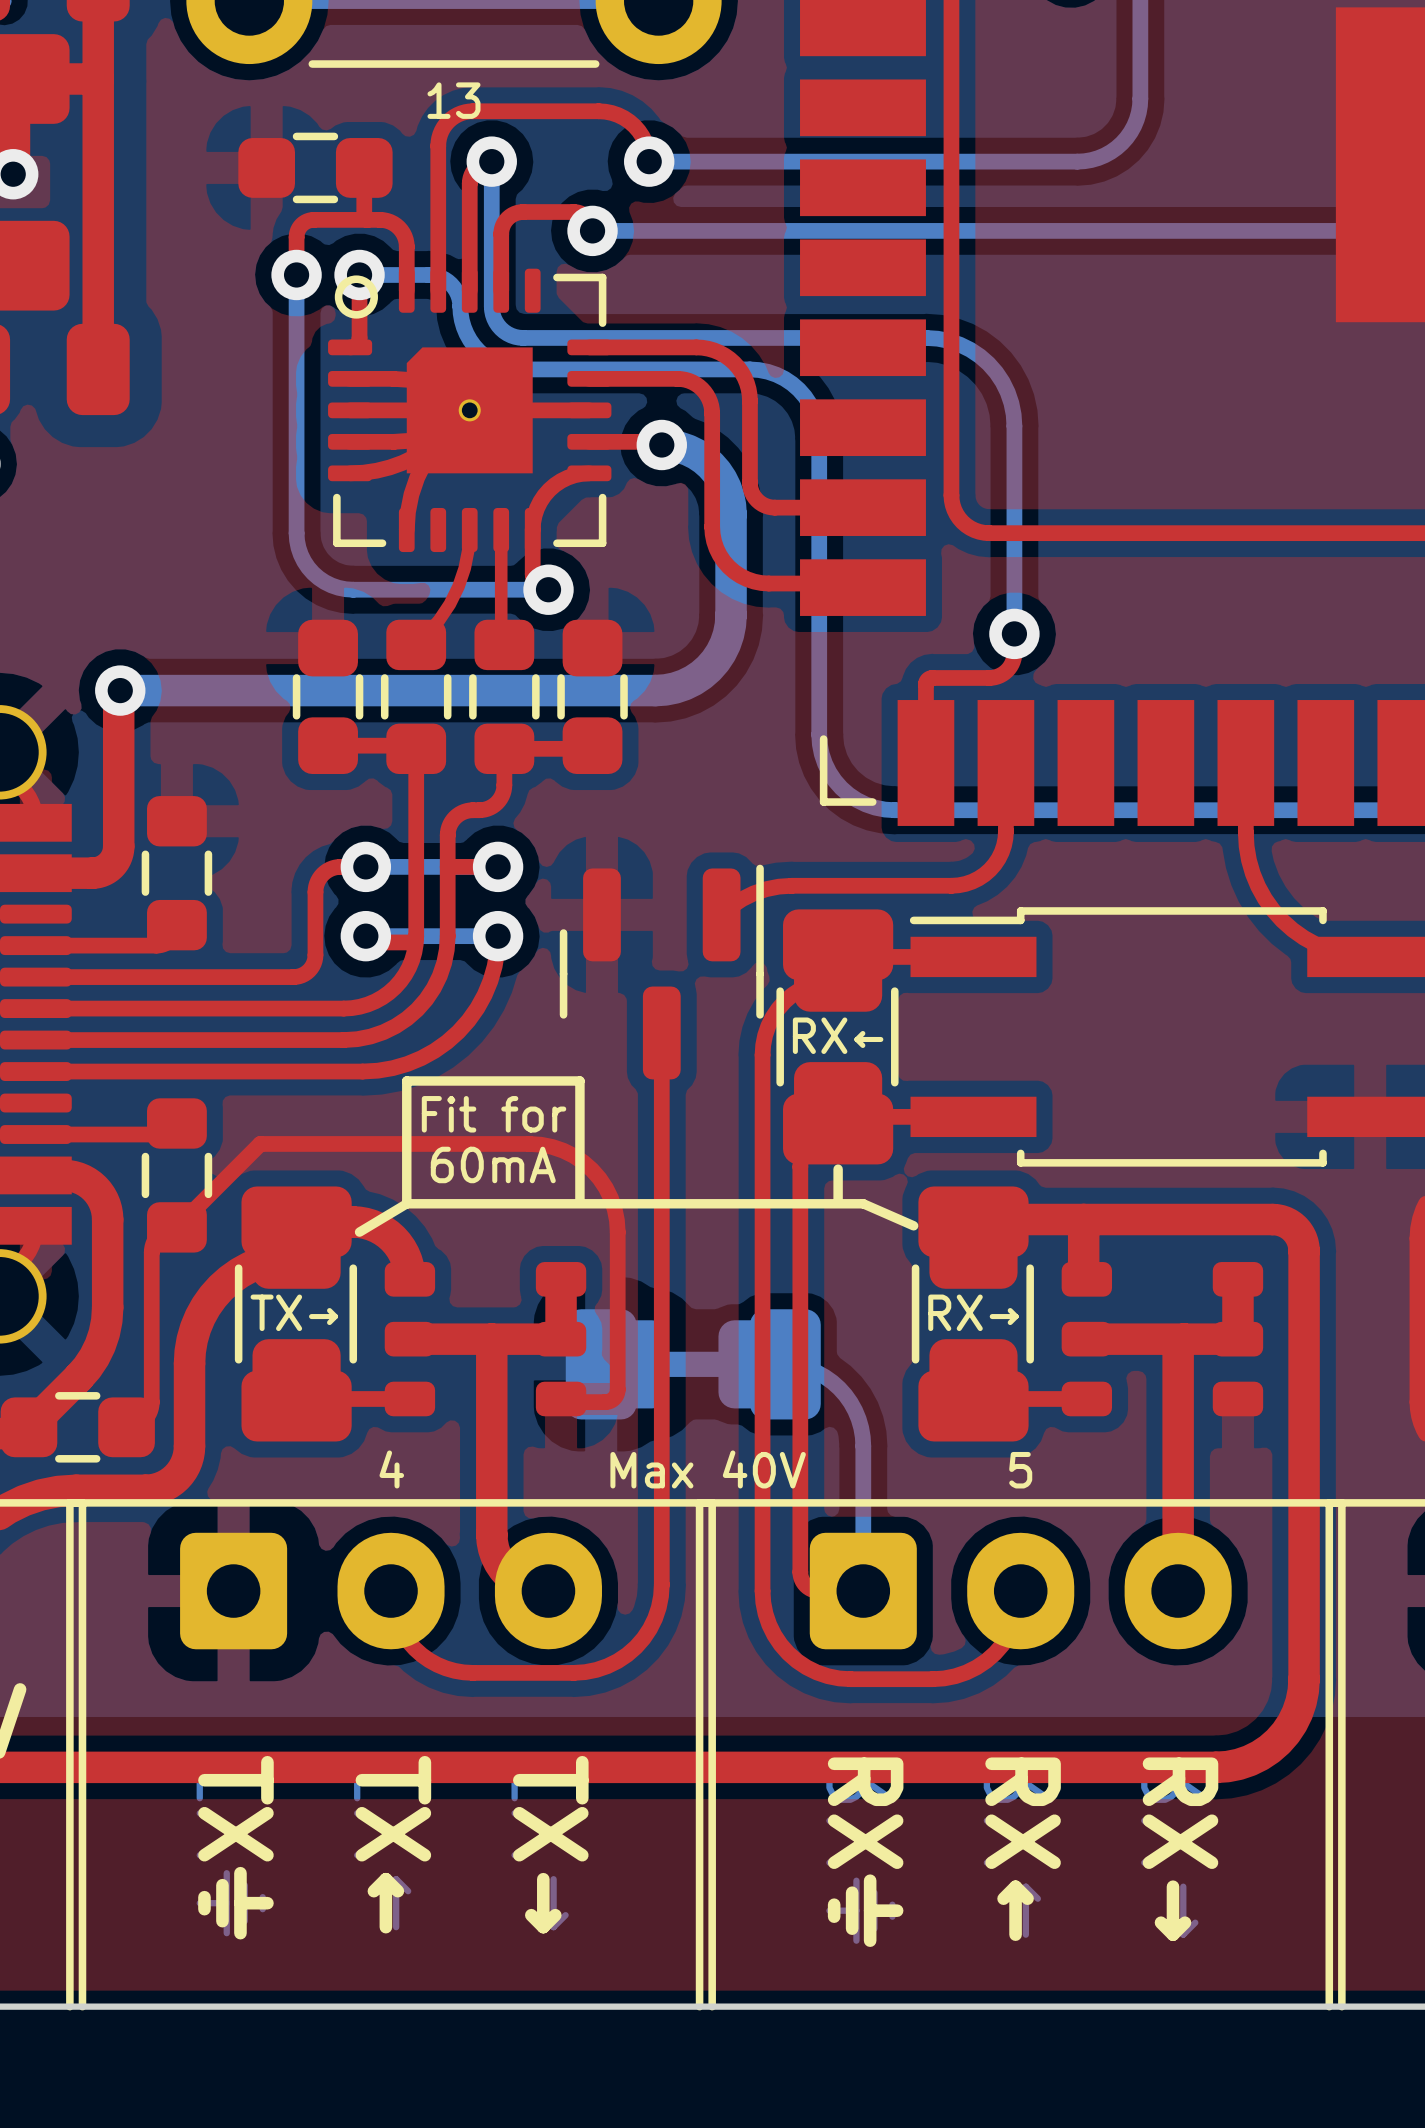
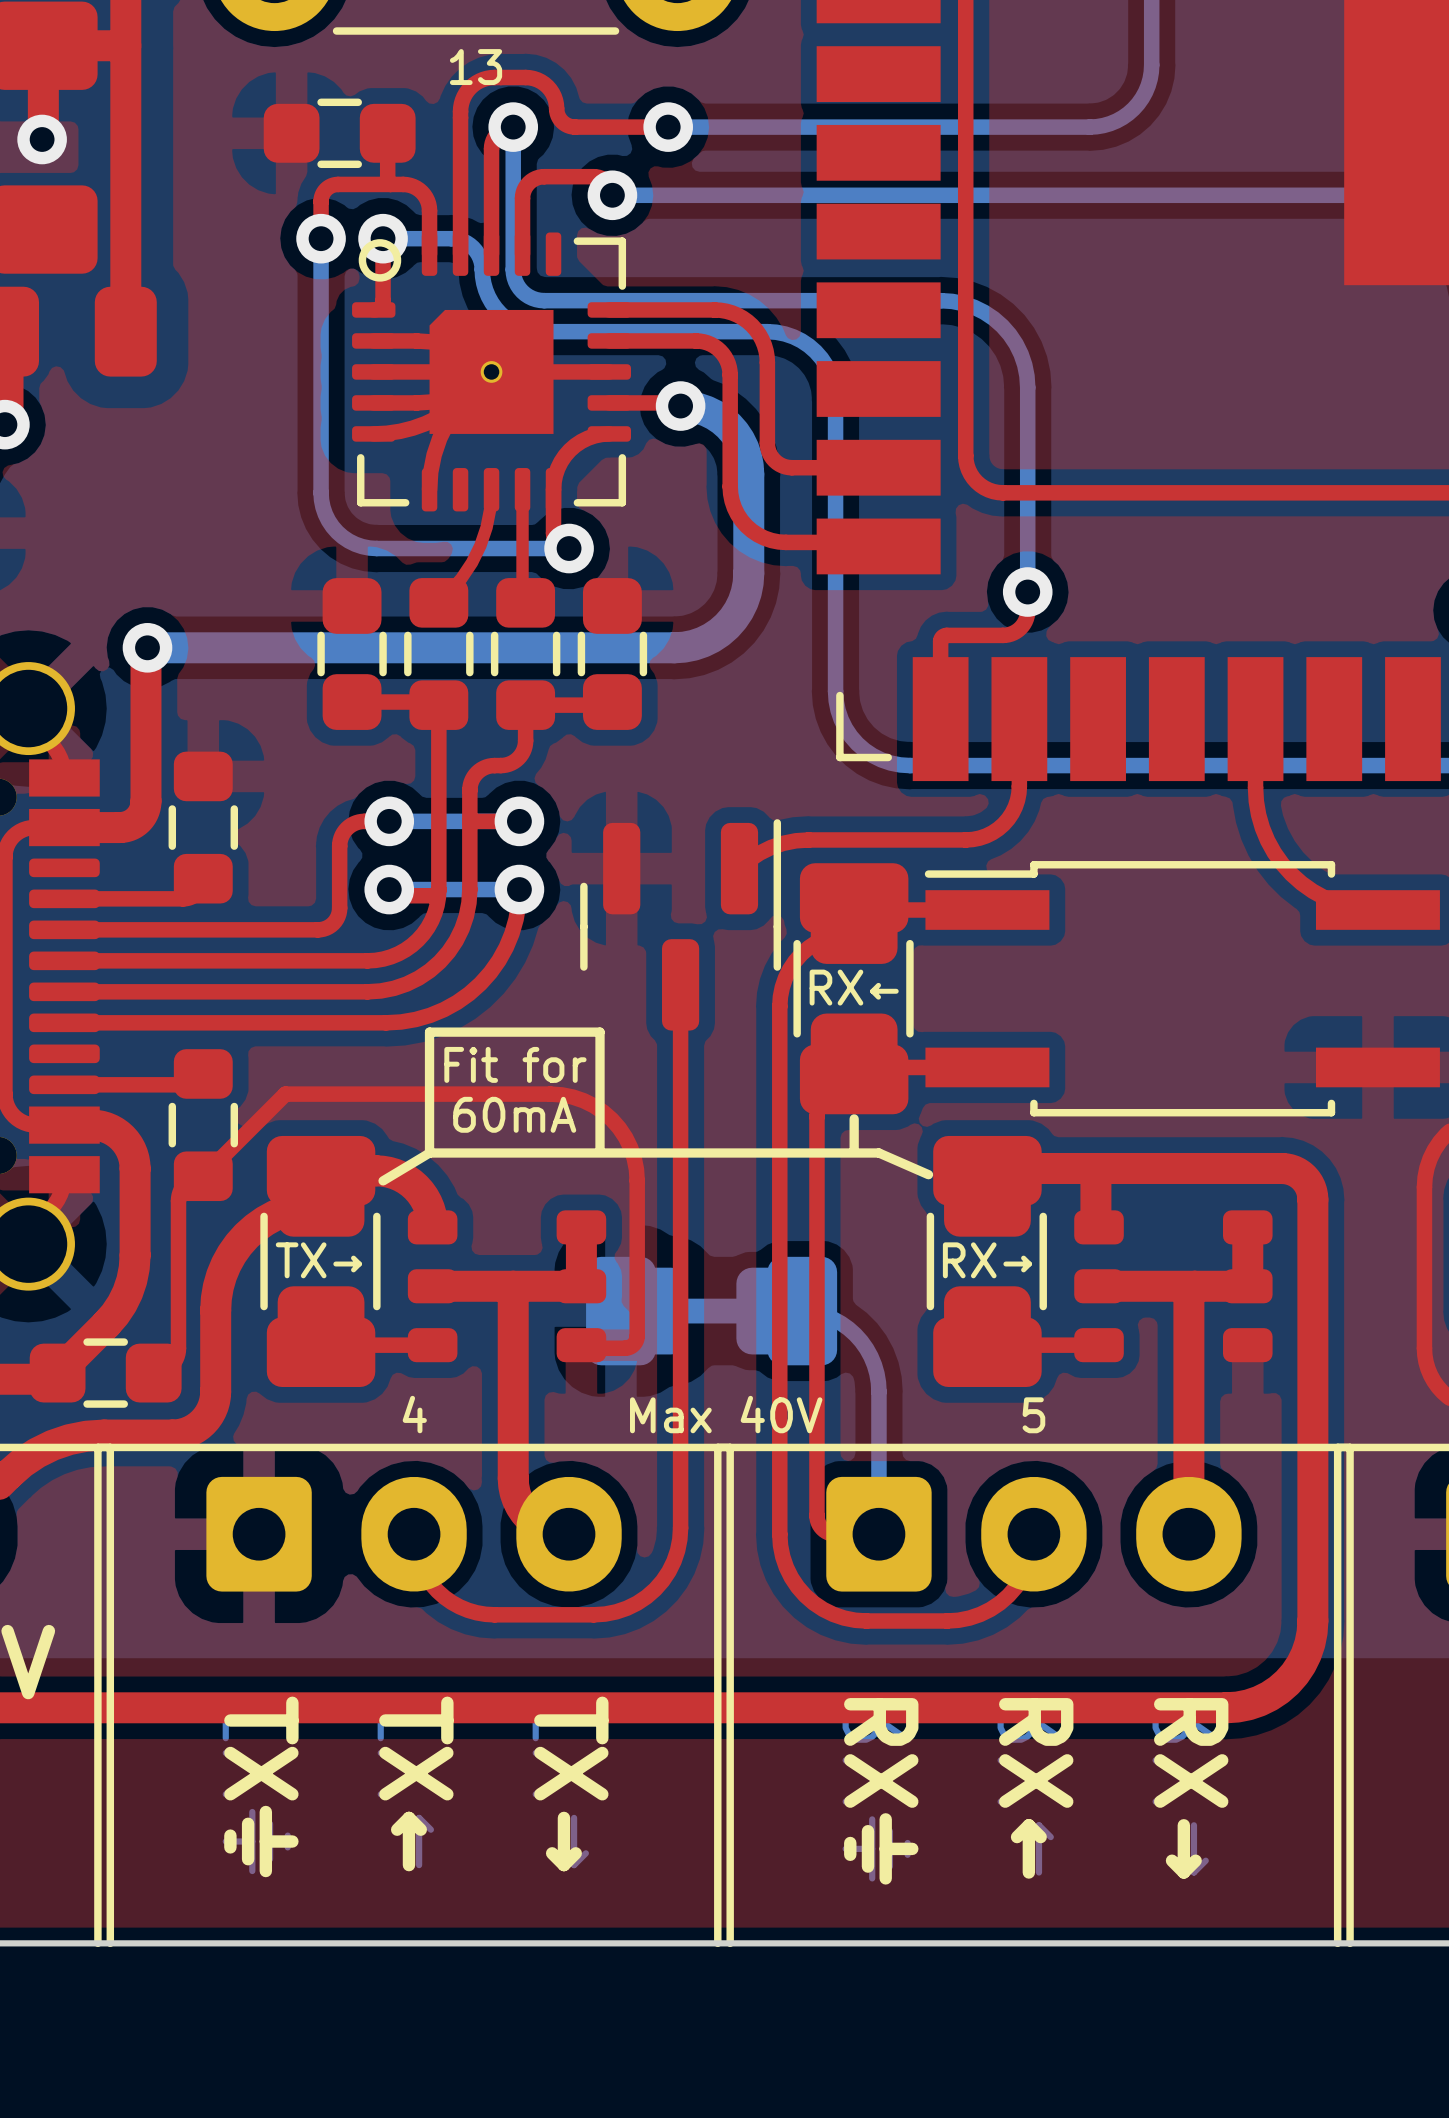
top track: (504, 111) (598, 111) (618, 115) (629, 121) (638, 130) (645, 142) (649, 161) -> (525, 77) (537, 79) (547, 86) (554, 96) (559, 117) (568, 125) (668, 127)

